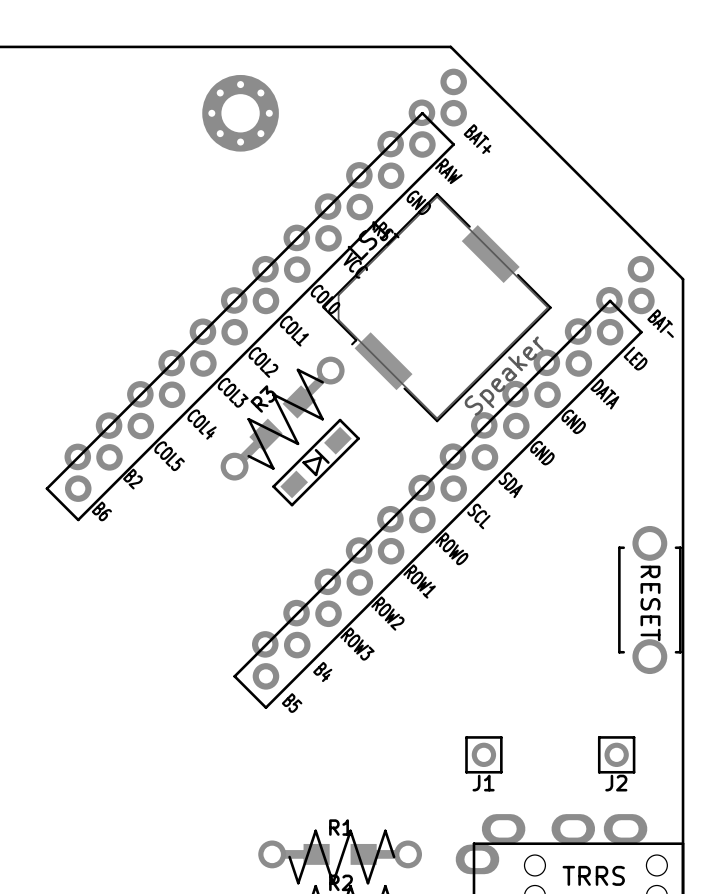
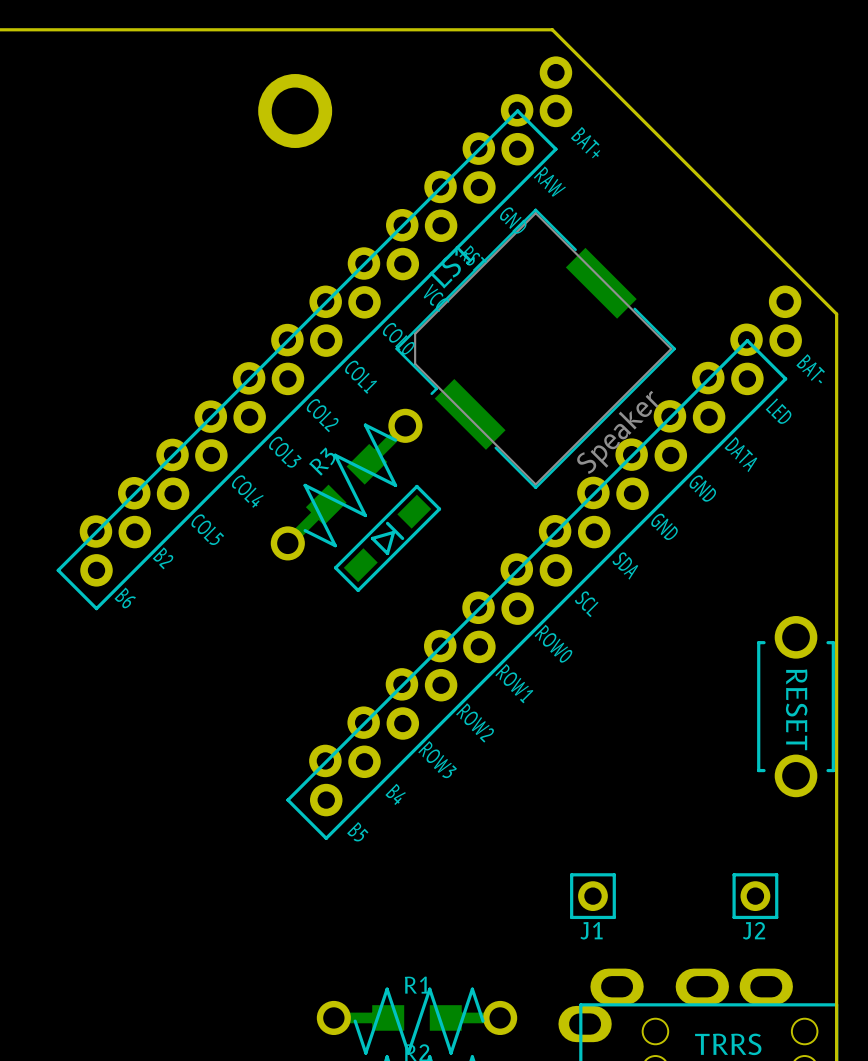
part footprint: [202, 74, 279, 152] -> [258, 74, 333, 148]

